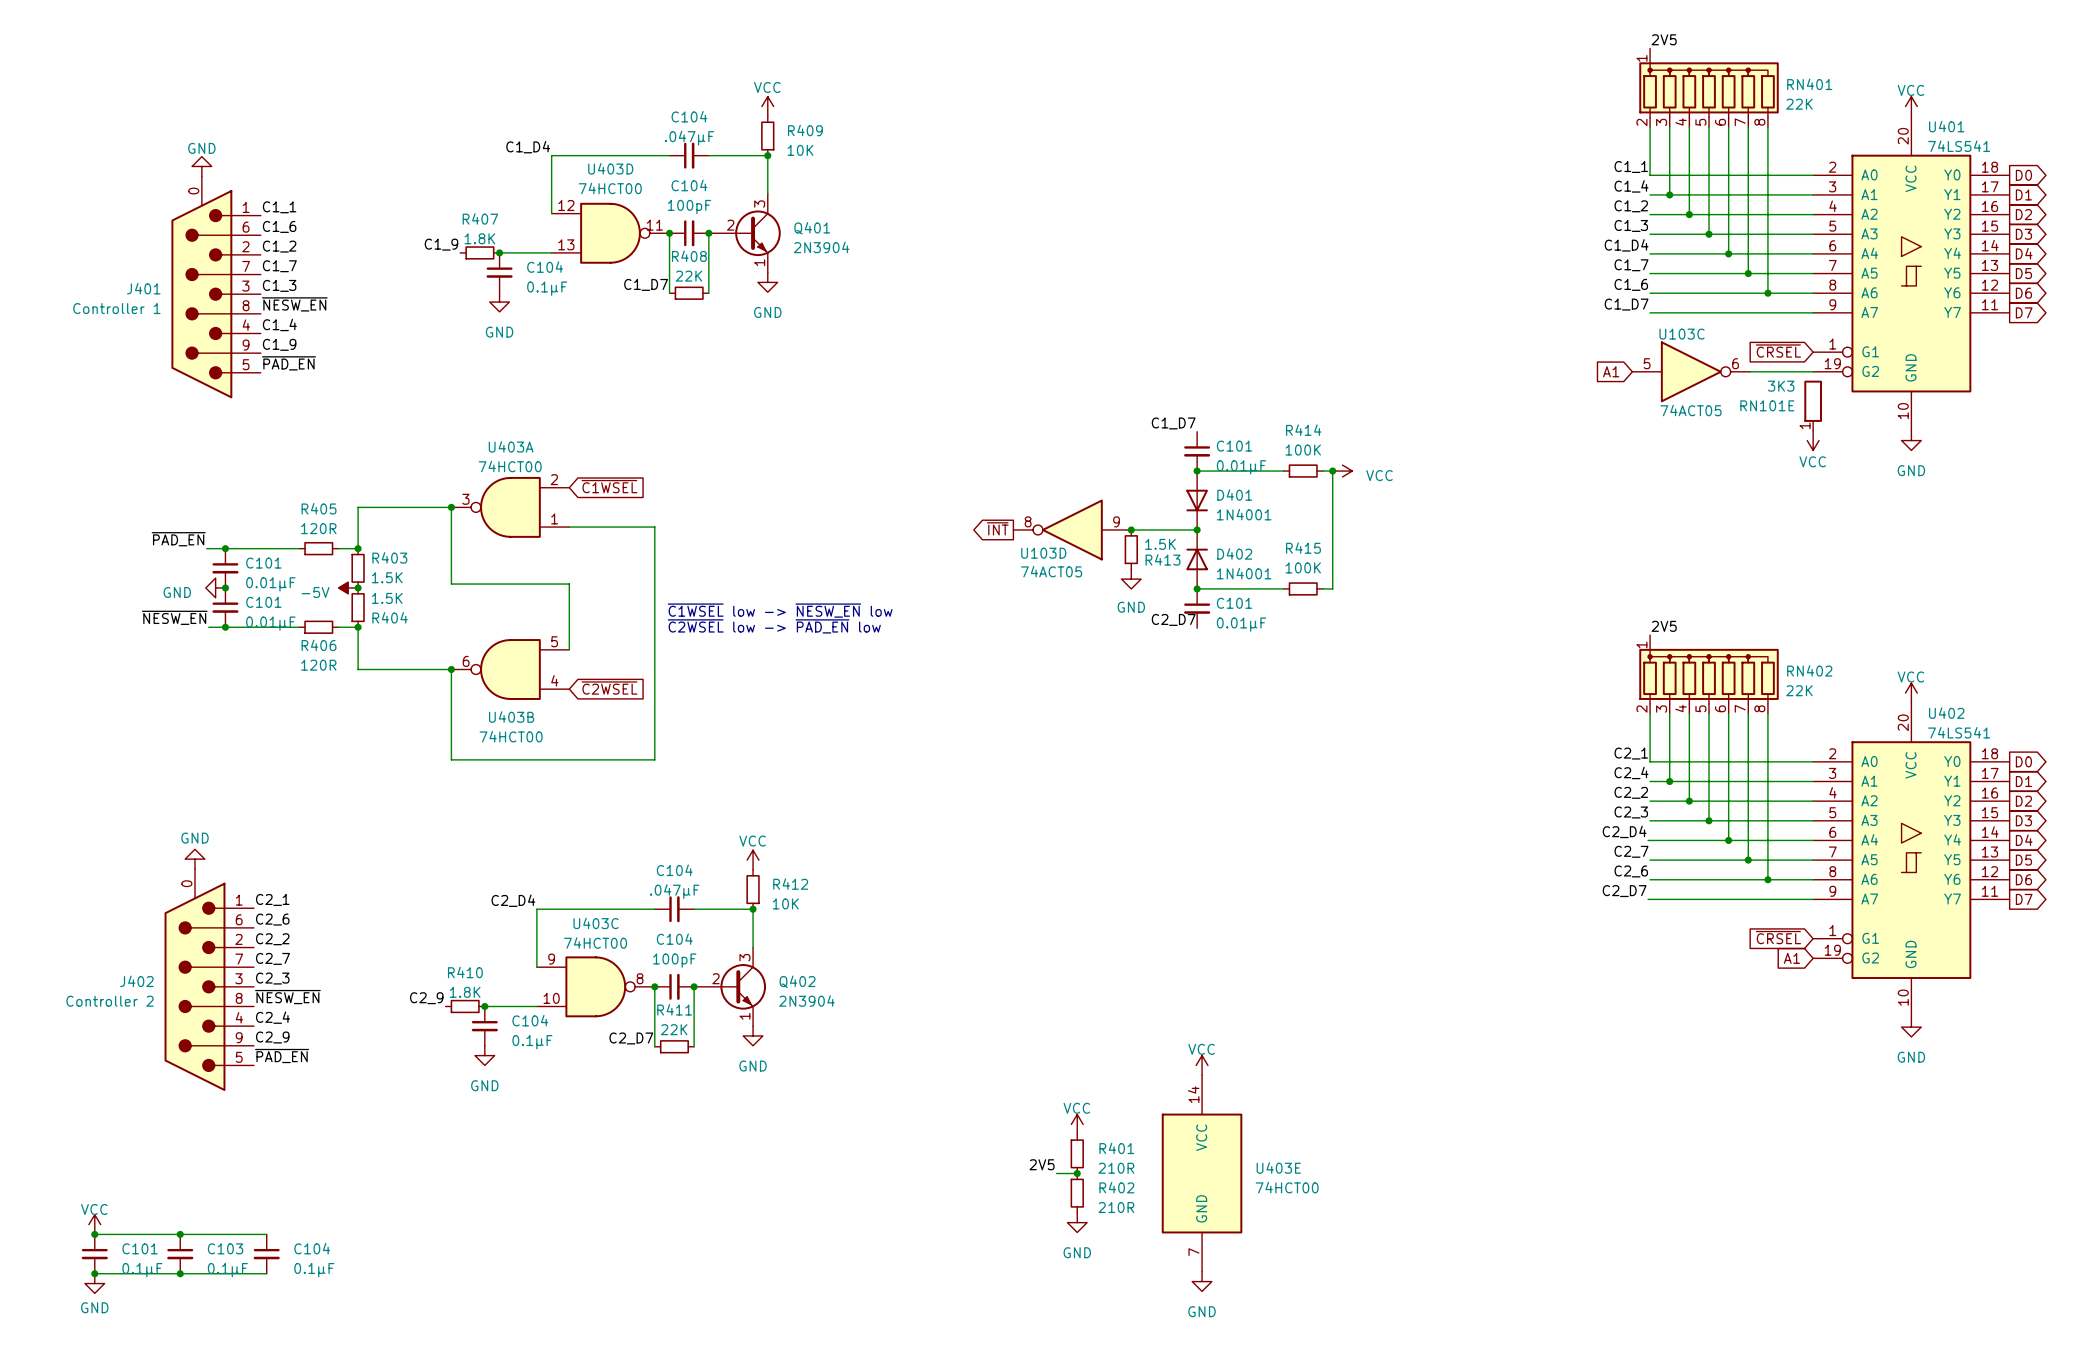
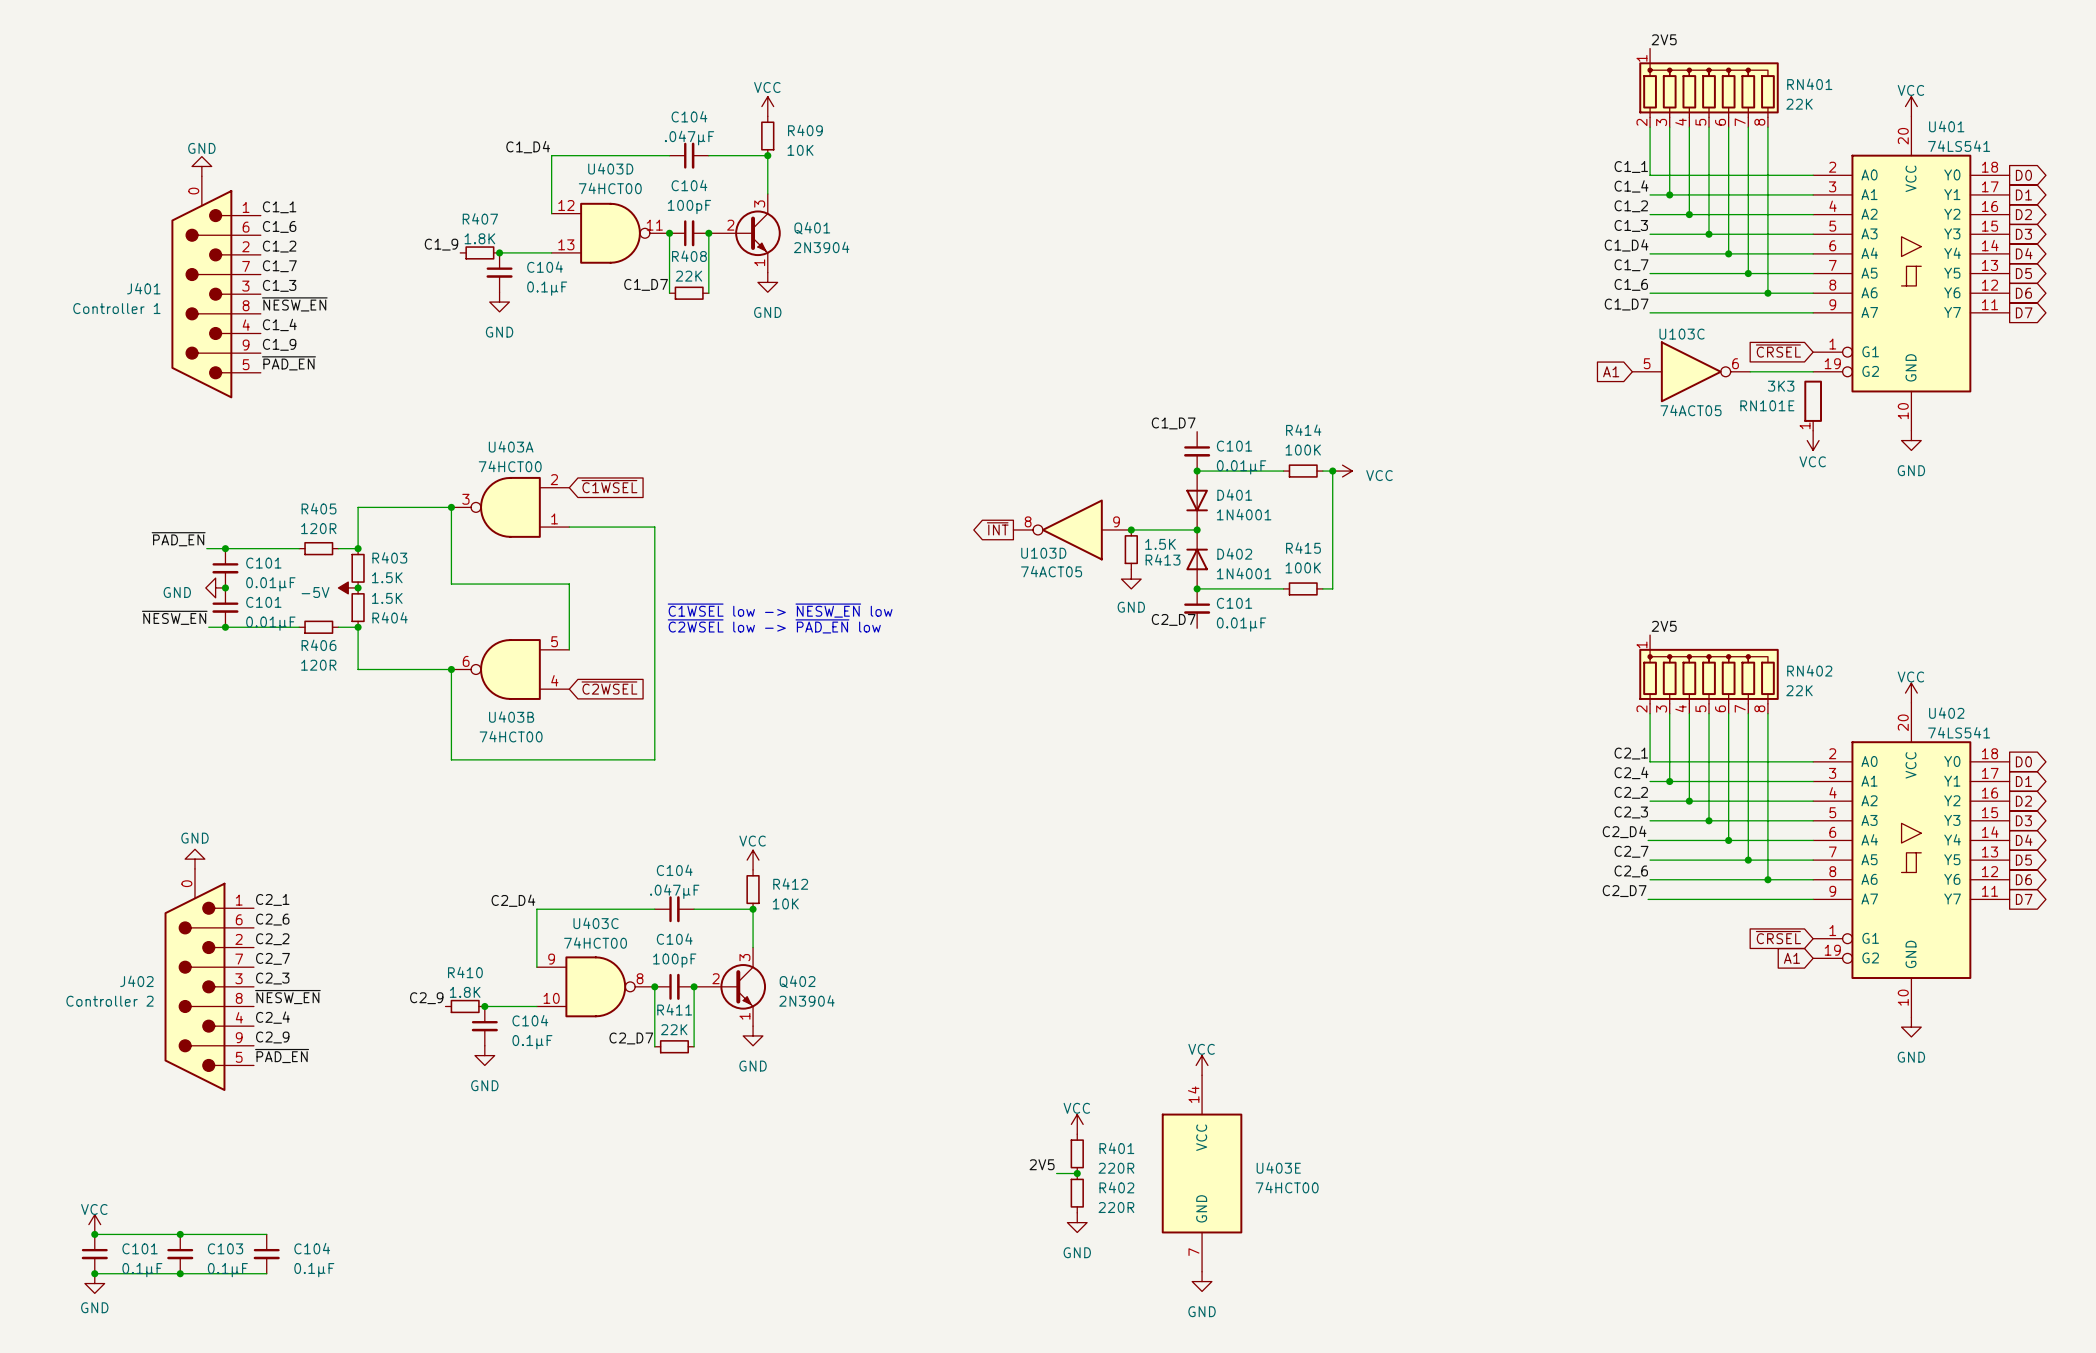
R401 value: 210R (1116, 1168) -> 220R (1116, 1168)
R402 value: 210R (1116, 1207) -> 220R (1116, 1207)

